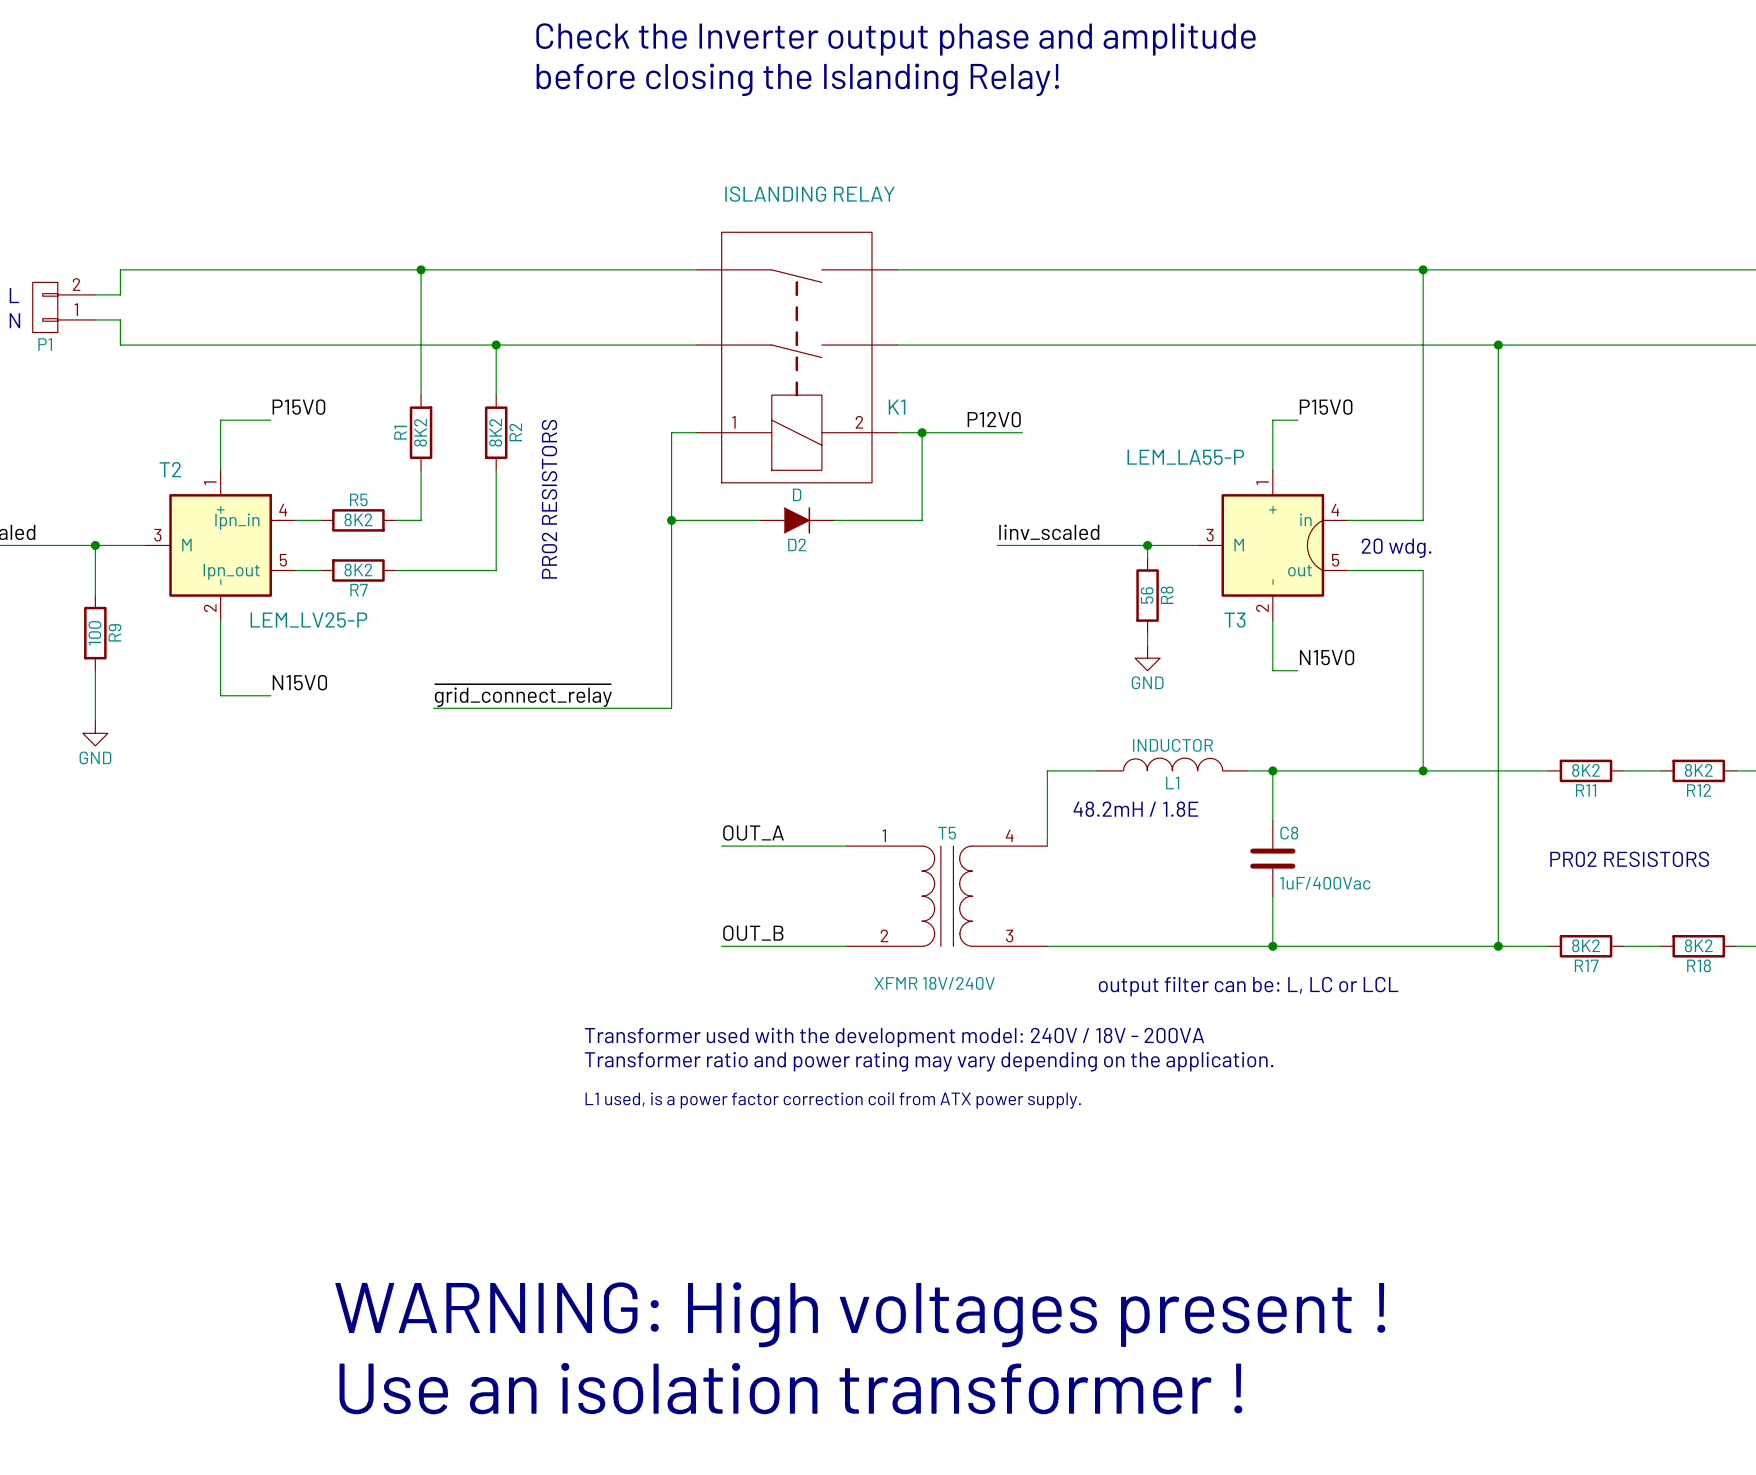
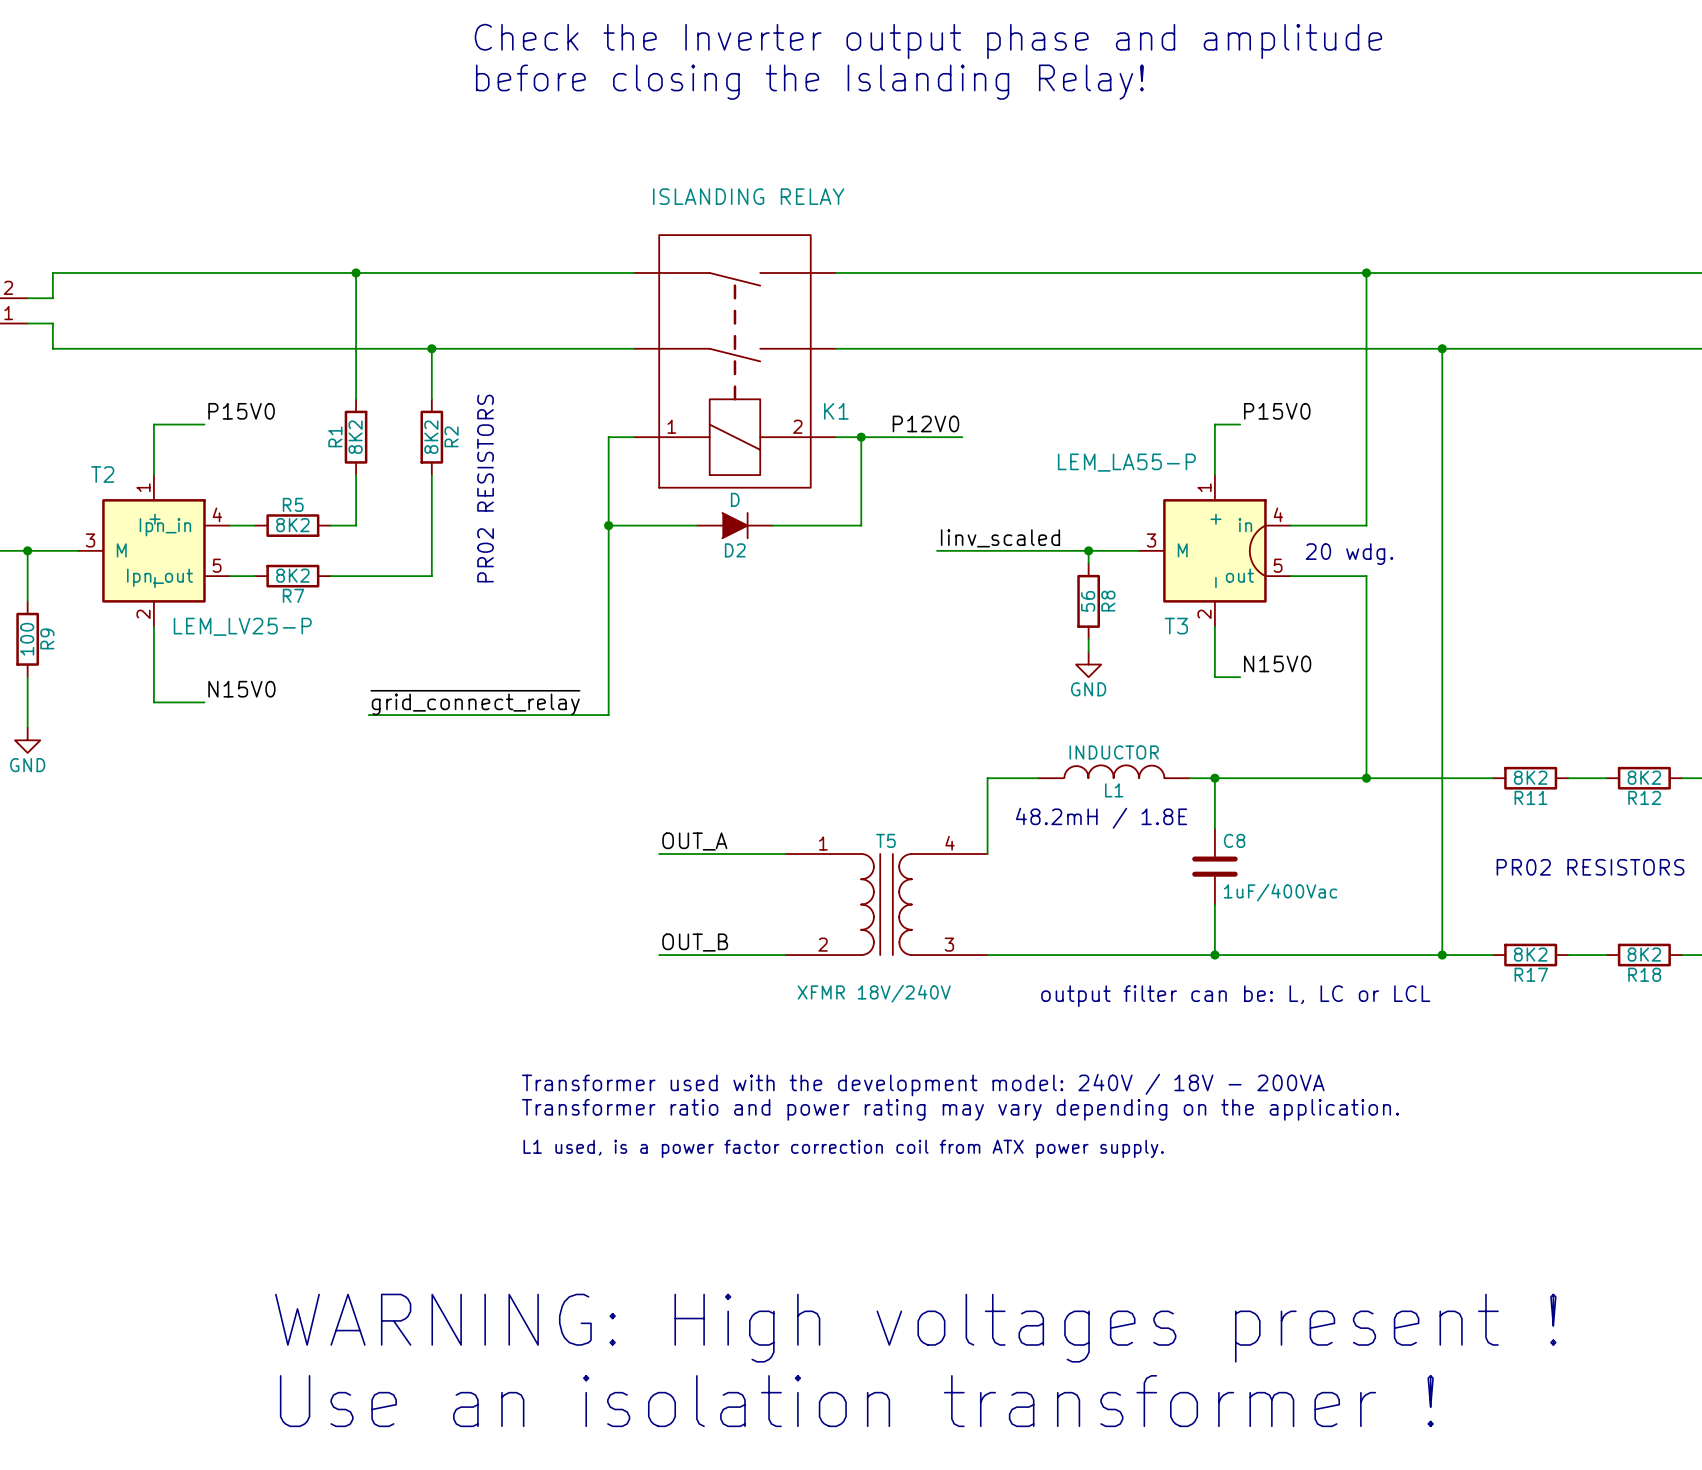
text position: Transformer used with the development model: 240V / 18V - 200VA (894, 1037) -> Transformer used with the development model: 240V / 18V - 200VA (923, 1085)
text: Transformer ratio and power rating may vary depending on the application. (929, 1061) -> none
text: L1 used, is a power factor correction coil from ATX power supply. (833, 1100) -> Transformer ratio and power rating may vary depending on the application. (960, 1109)
text: none -> L1 used, is a power factor correction coil from ATX power supply. (843, 1148)

